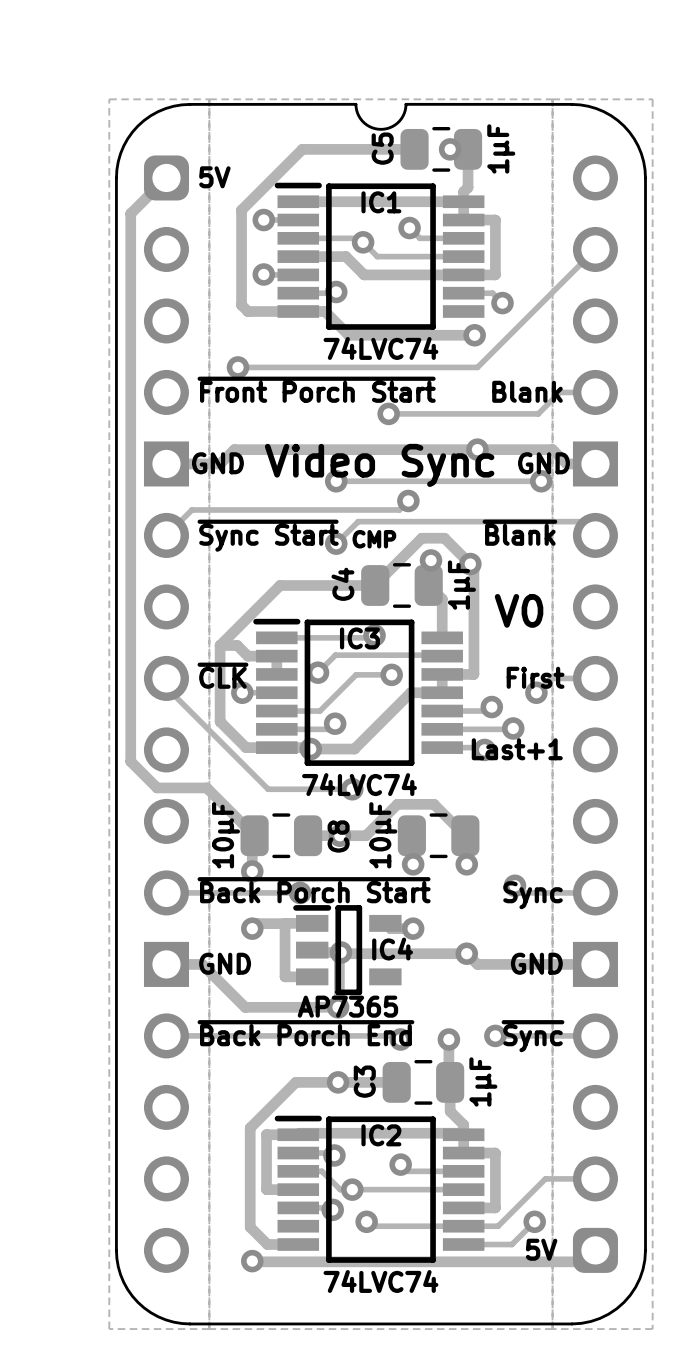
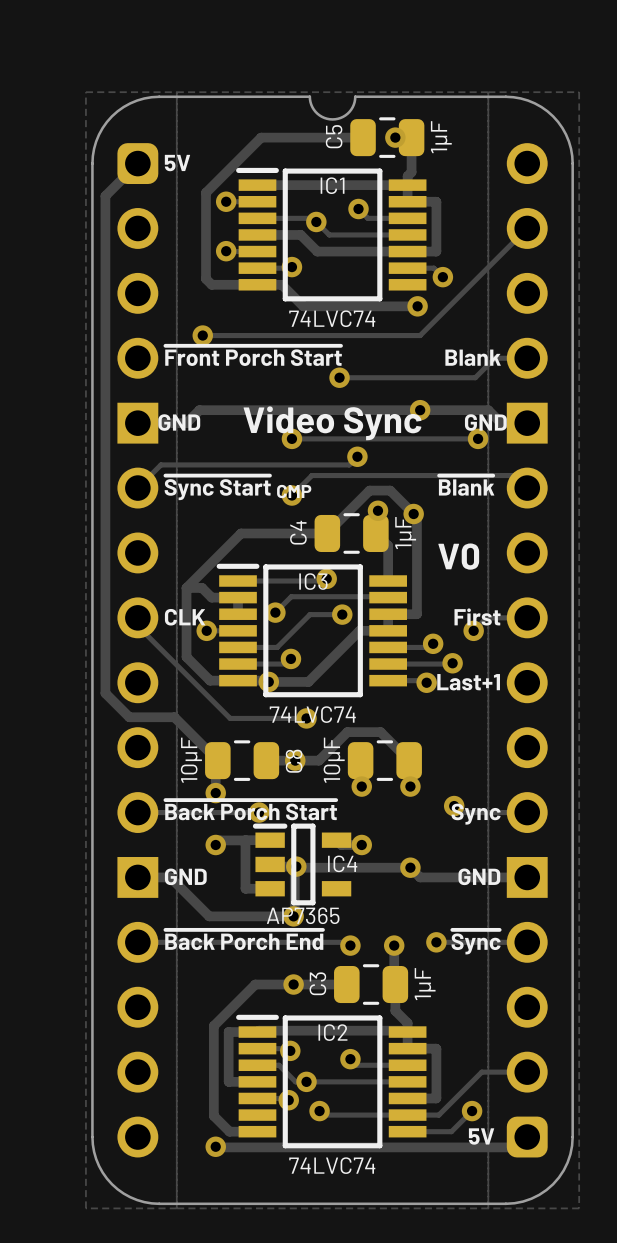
text: ~{CLK} (222, 675) -> CLK (185, 617)

